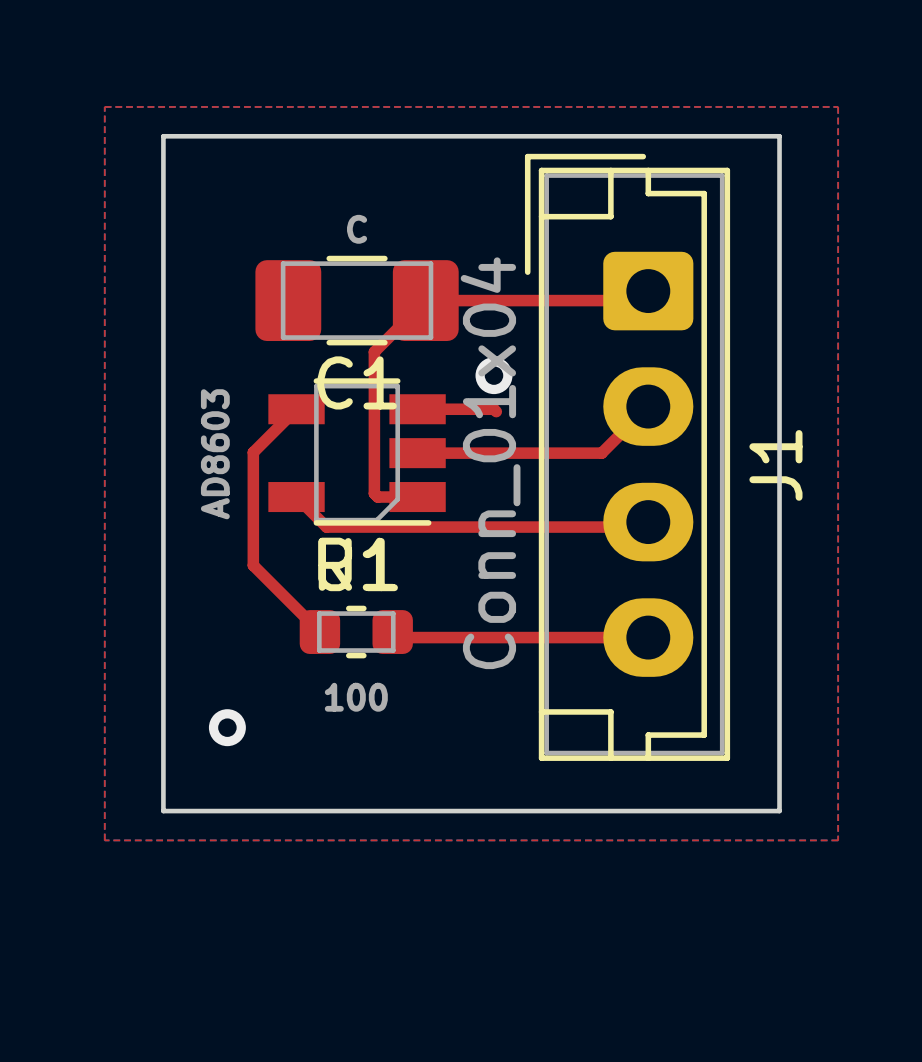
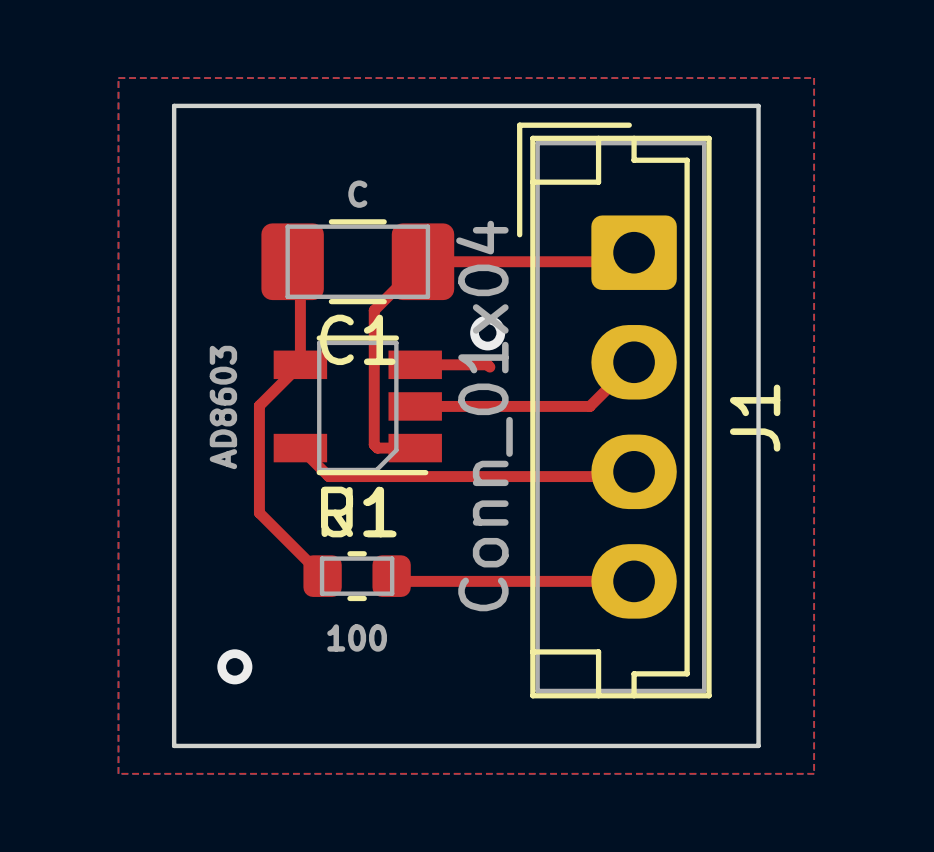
top track: none -> (300, 269) (300, 364)

